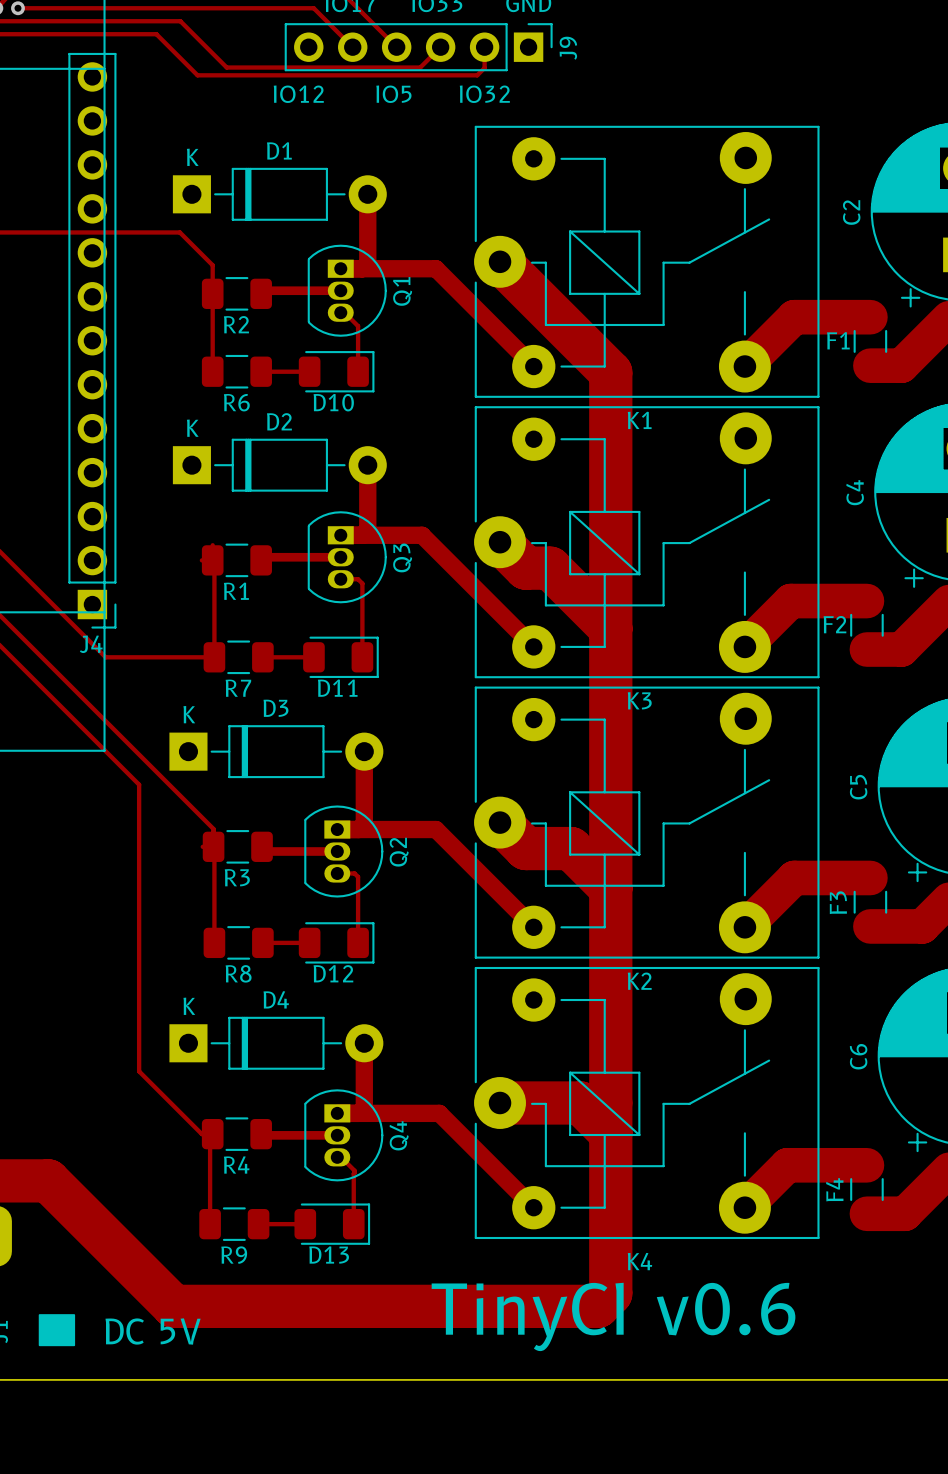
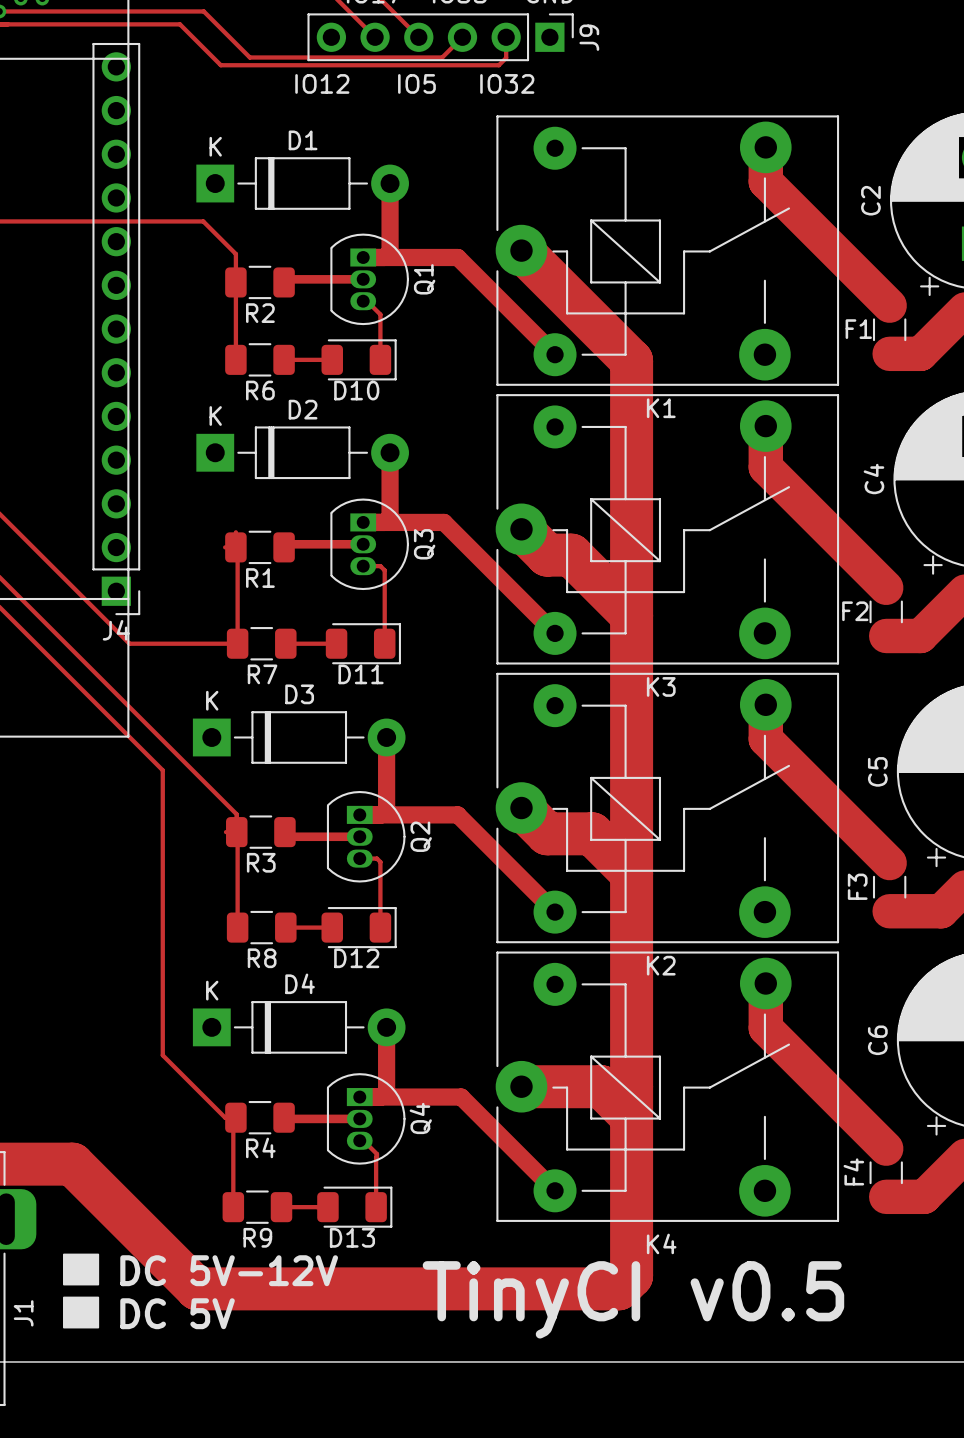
track: (870, 317) (794, 317) (744, 366) -> (889, 305) (765, 181) (765, 147)
track: (866, 601) (790, 601) (744, 646) -> (886, 587) (765, 467) (765, 426)
track: (870, 877) (794, 877) (744, 927) -> (889, 863) (765, 739) (765, 704)
track: (866, 1165) (787, 1165) (744, 1207) -> (886, 1148) (765, 1028) (765, 983)
drawing: none -> [63, 1253, 100, 1286]
text: none -> DC 5V-12V (229, 1270)
text: TinyCI v0.6 (613, 1316) -> TinyCI v0.5 (633, 1299)

